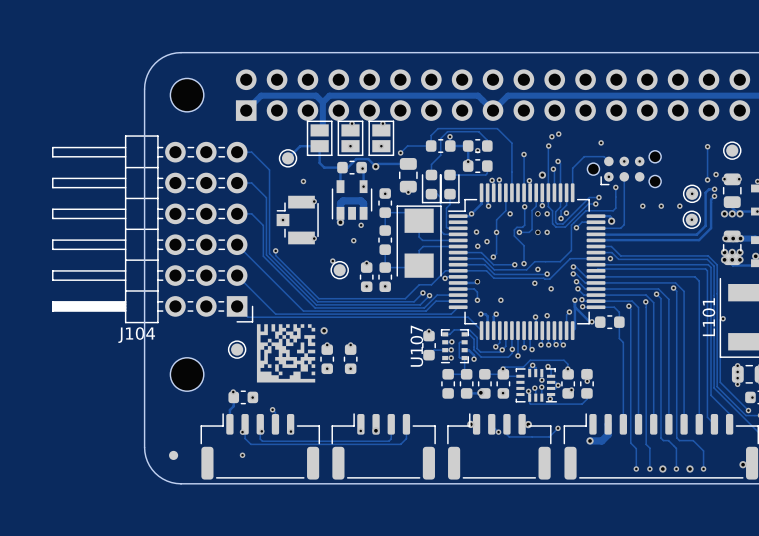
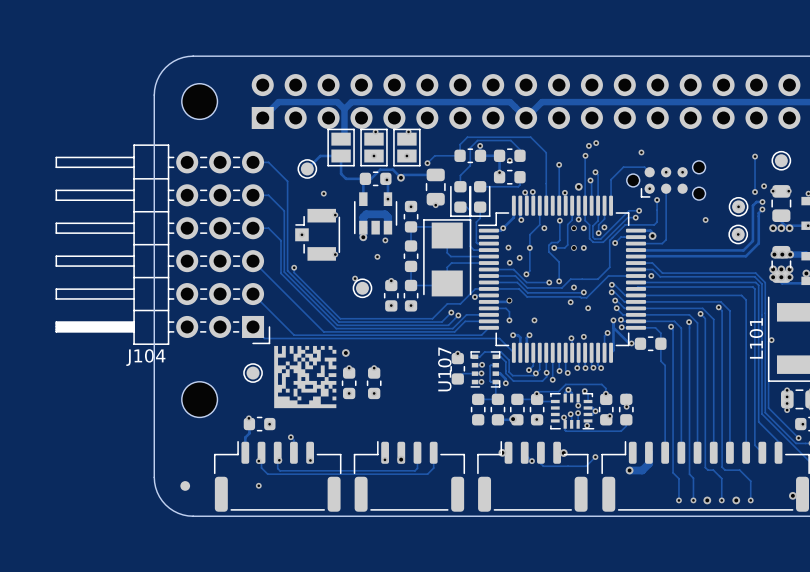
via: (642, 206) -> none
via: (679, 206) -> none

